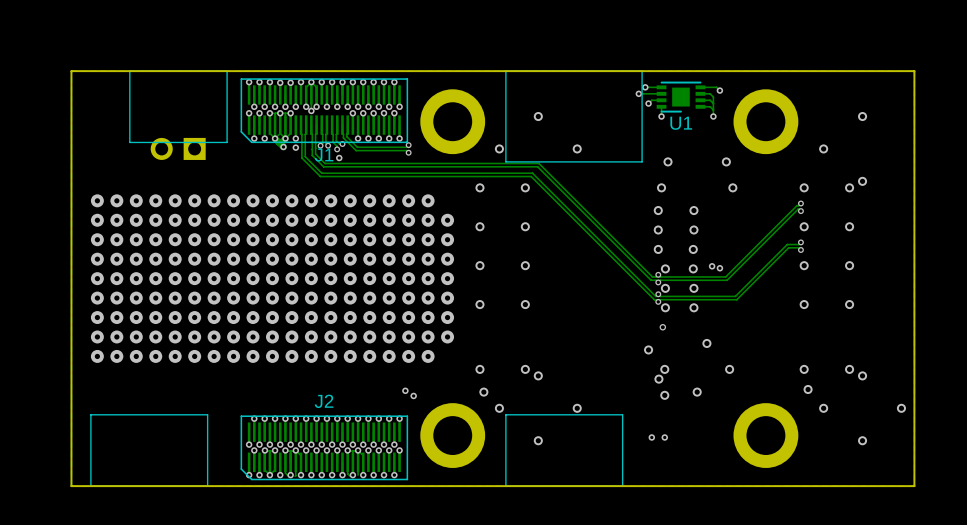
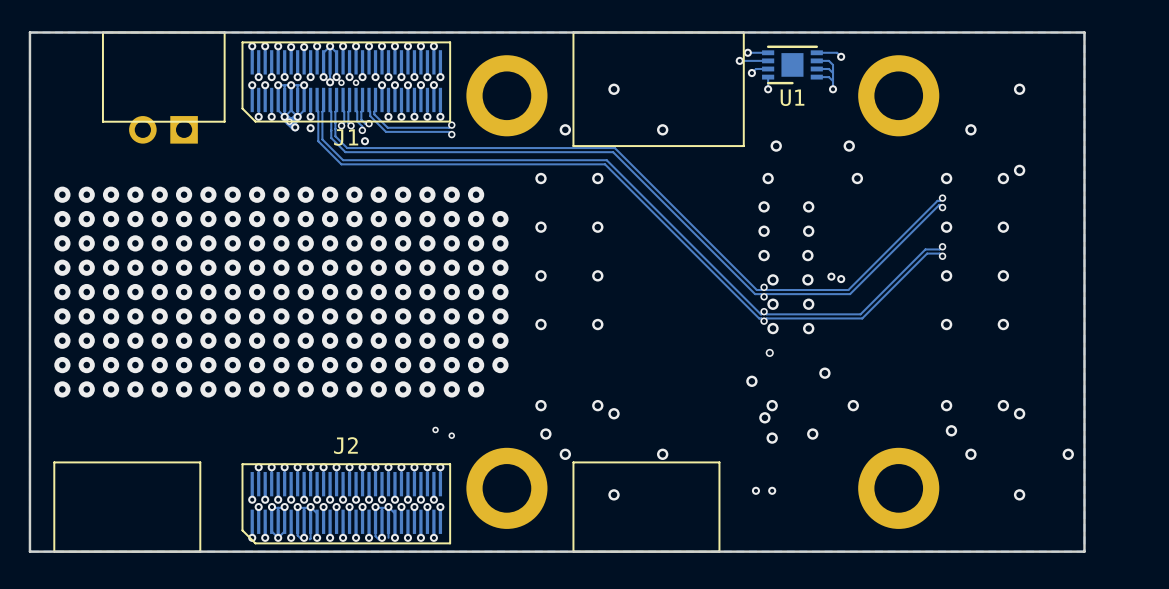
via: none -> (341, 82)
via: none -> (356, 82)
via: none -> (289, 121)
via: none -> (435, 429)
via: (405, 390) -> none
via: none -> (451, 435)
via: (413, 395) -> none

